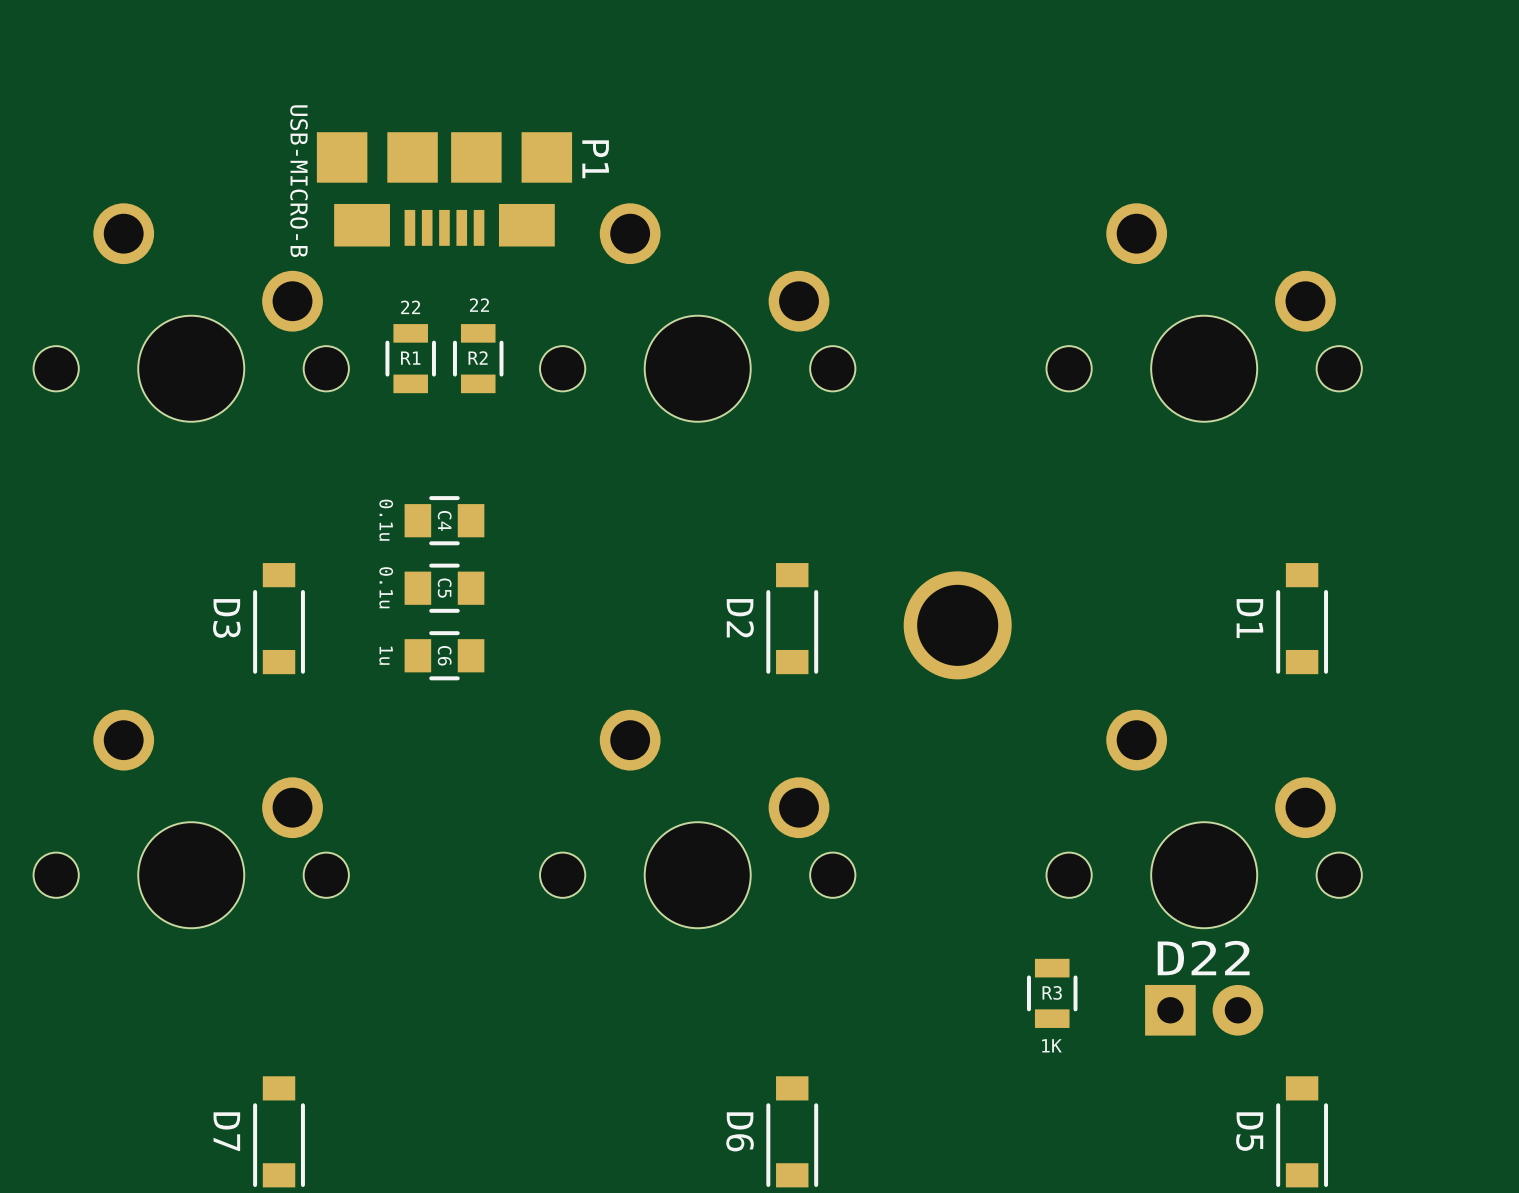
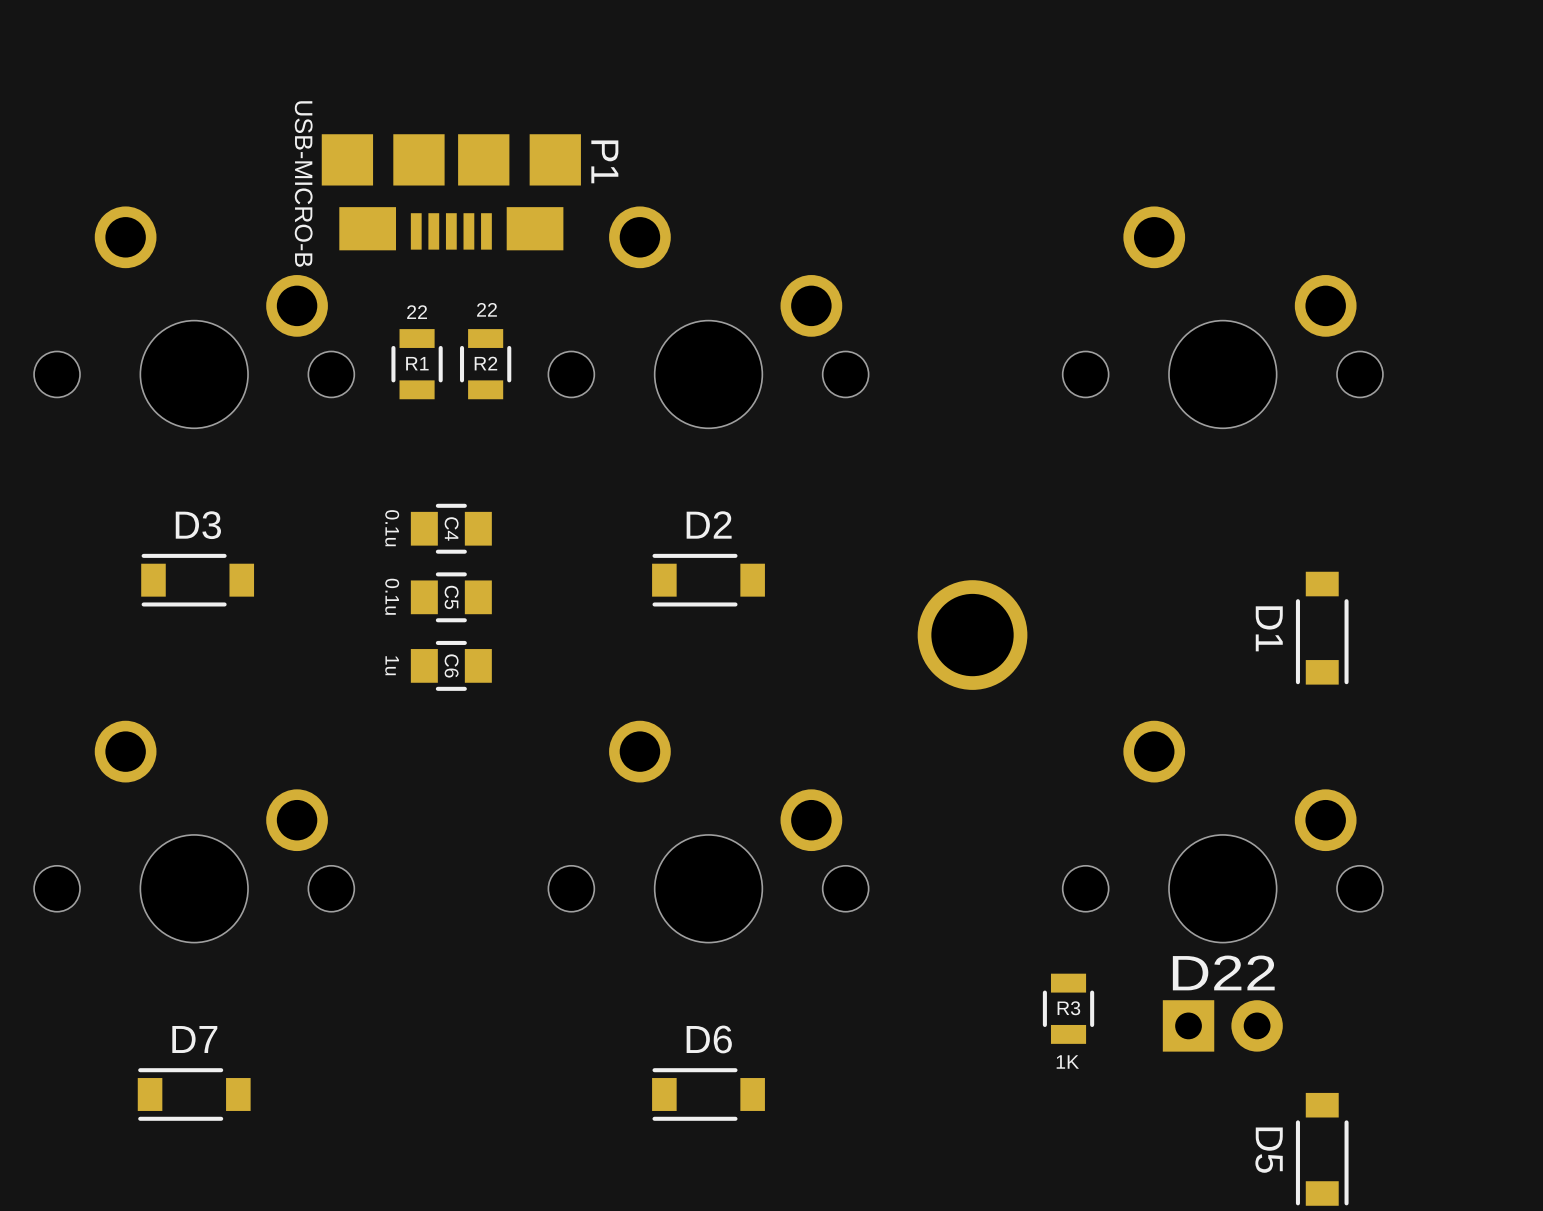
D3 rotation: 0° (279, 618) -> 90° clockwise (197, 580)
D3 position: (279, 618) -> (197, 580)
D2 rotation: 0° (792, 618) -> 90° clockwise (708, 580)
D2 position: (792, 618) -> (708, 580)
D7 rotation: 0° (279, 1131) -> 90° clockwise (194, 1094)
D7 position: (279, 1131) -> (194, 1094)
D6 rotation: 0° (792, 1131) -> 90° clockwise (708, 1094)
D6 position: (792, 1131) -> (708, 1094)

